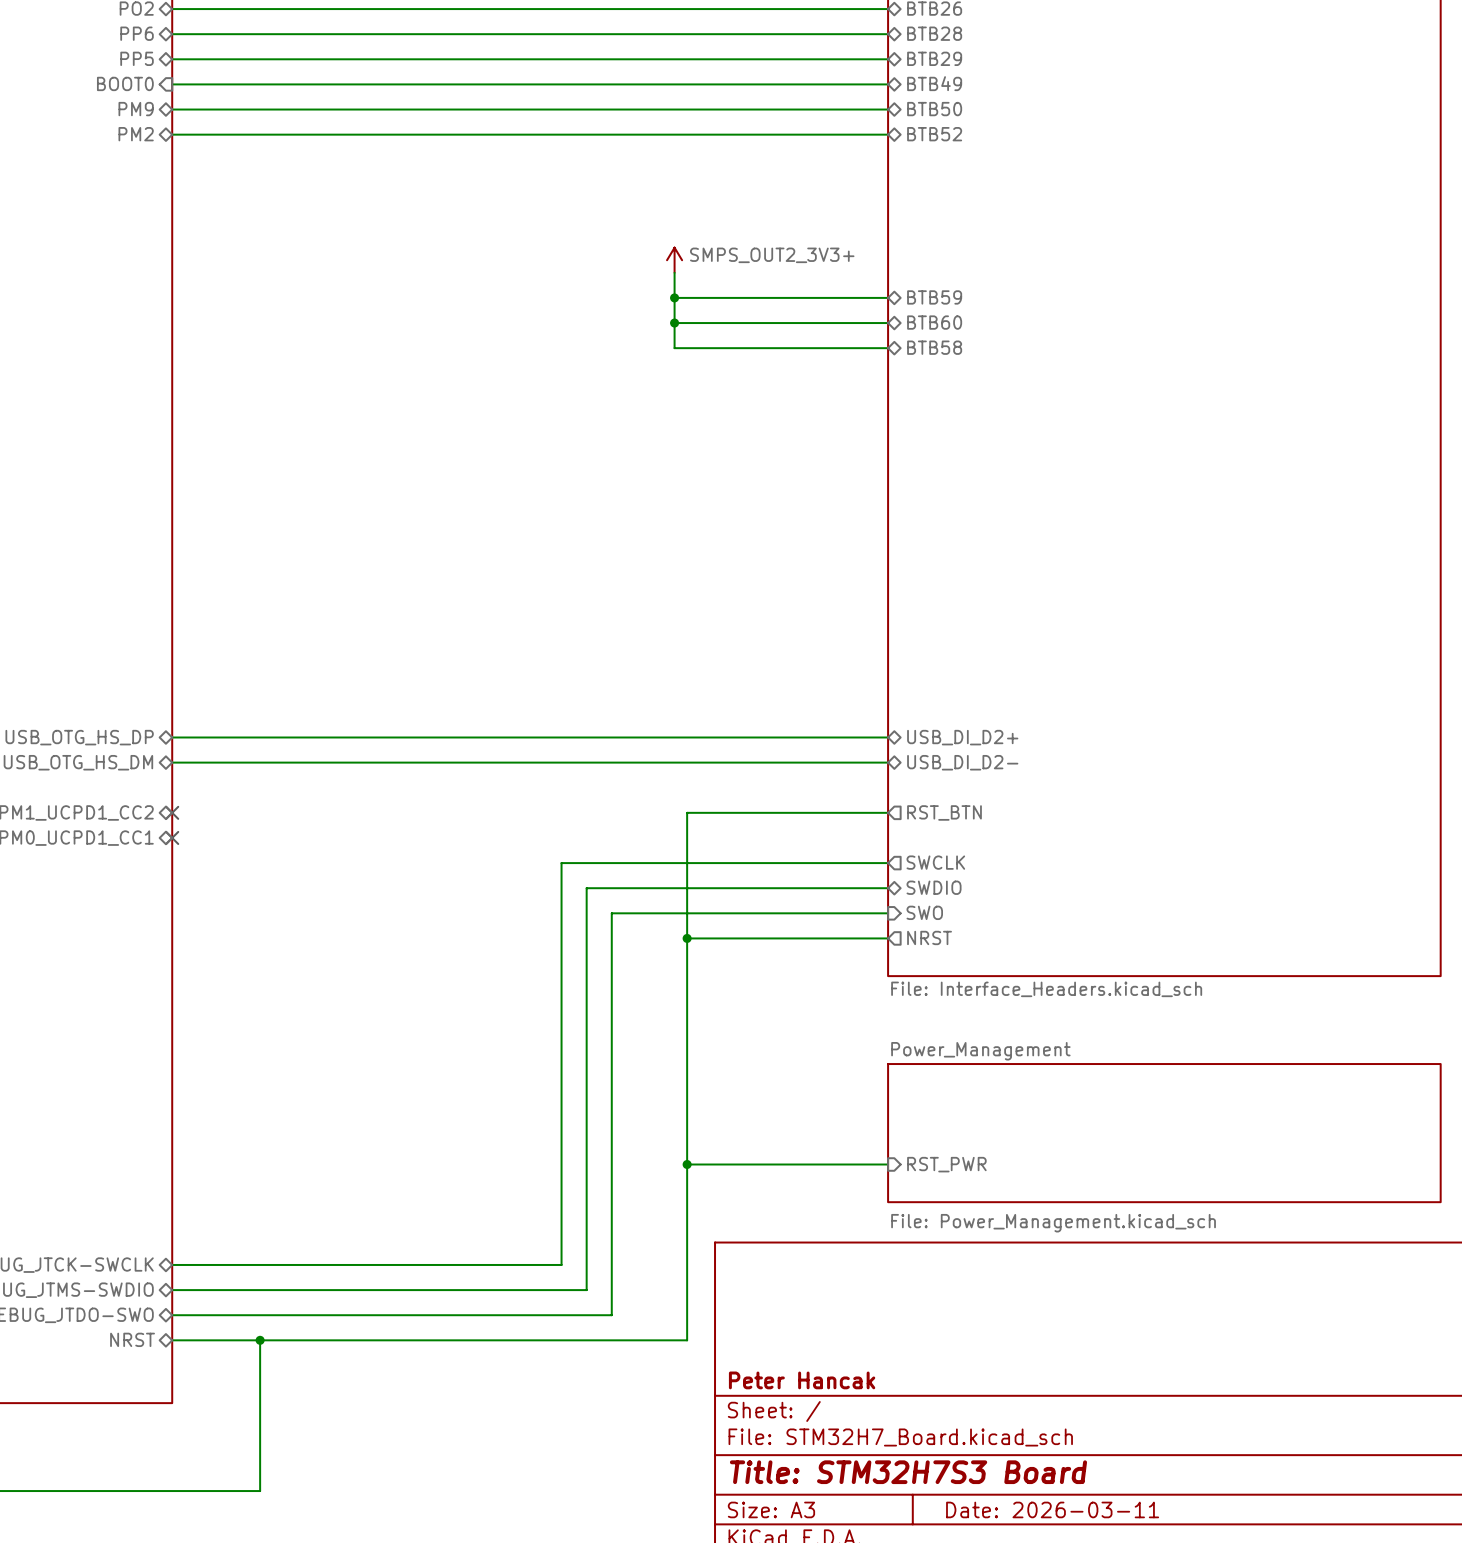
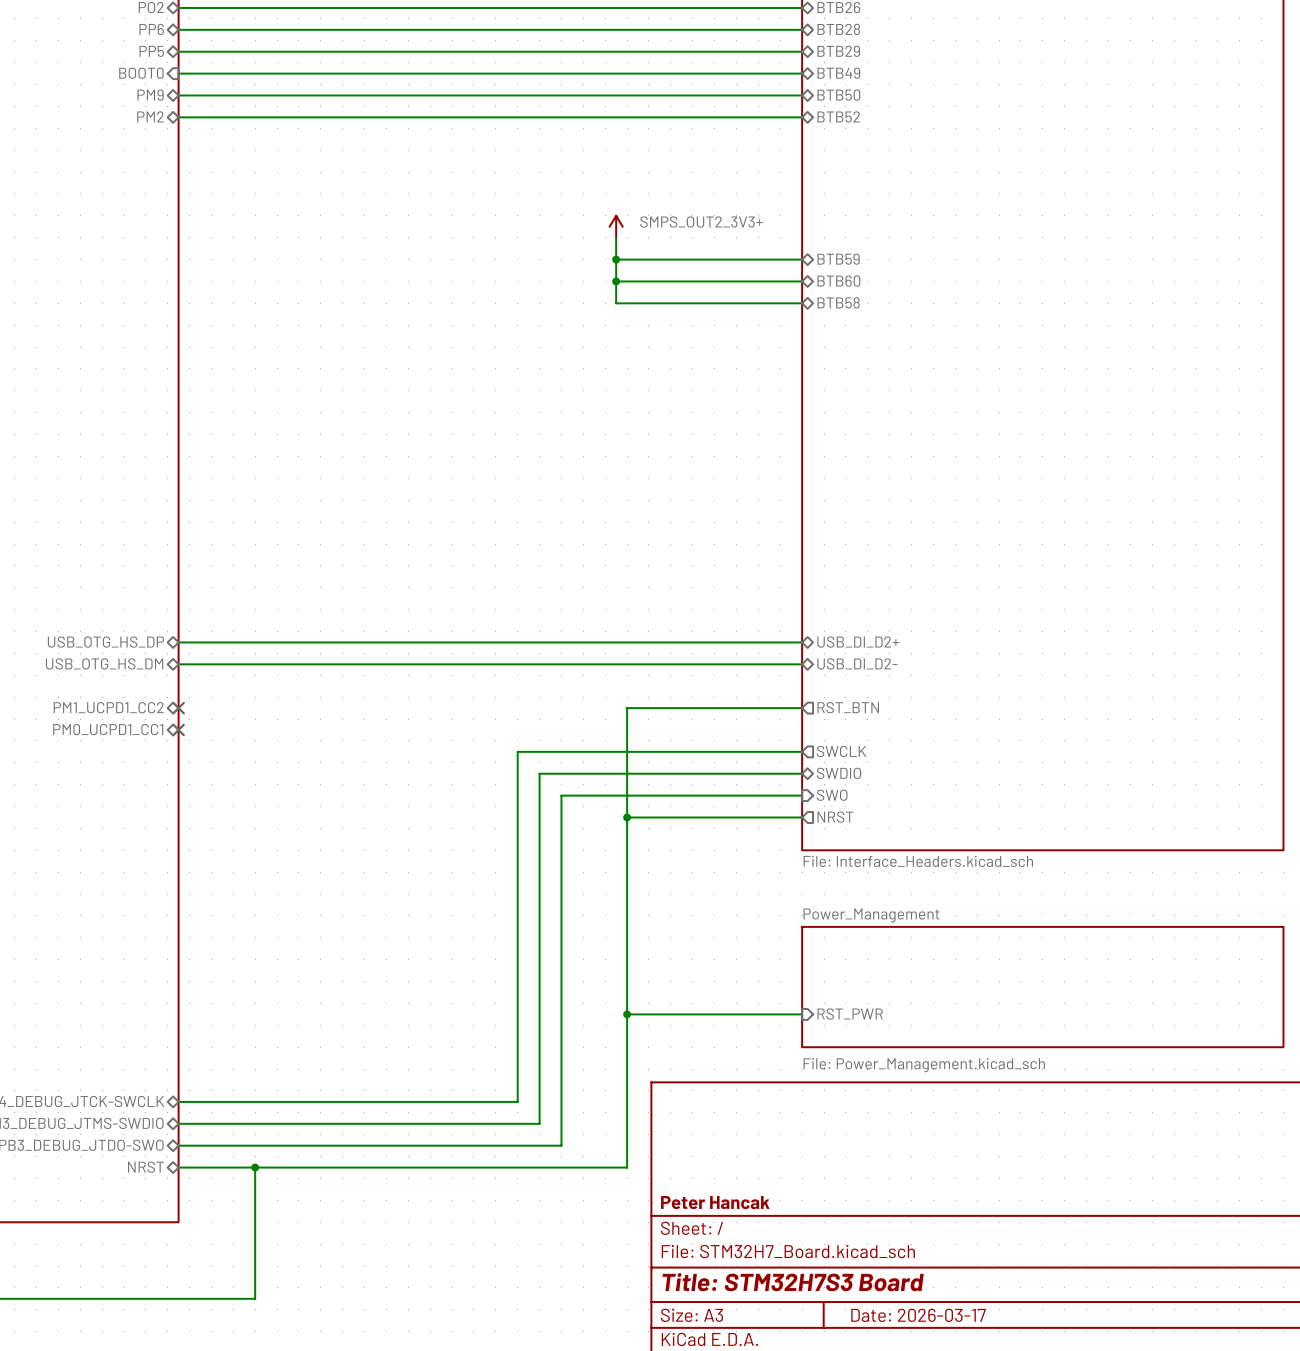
title block: Date: 2026-03-11 (1052, 1509) -> Date: 2026-03-17 (918, 1315)

